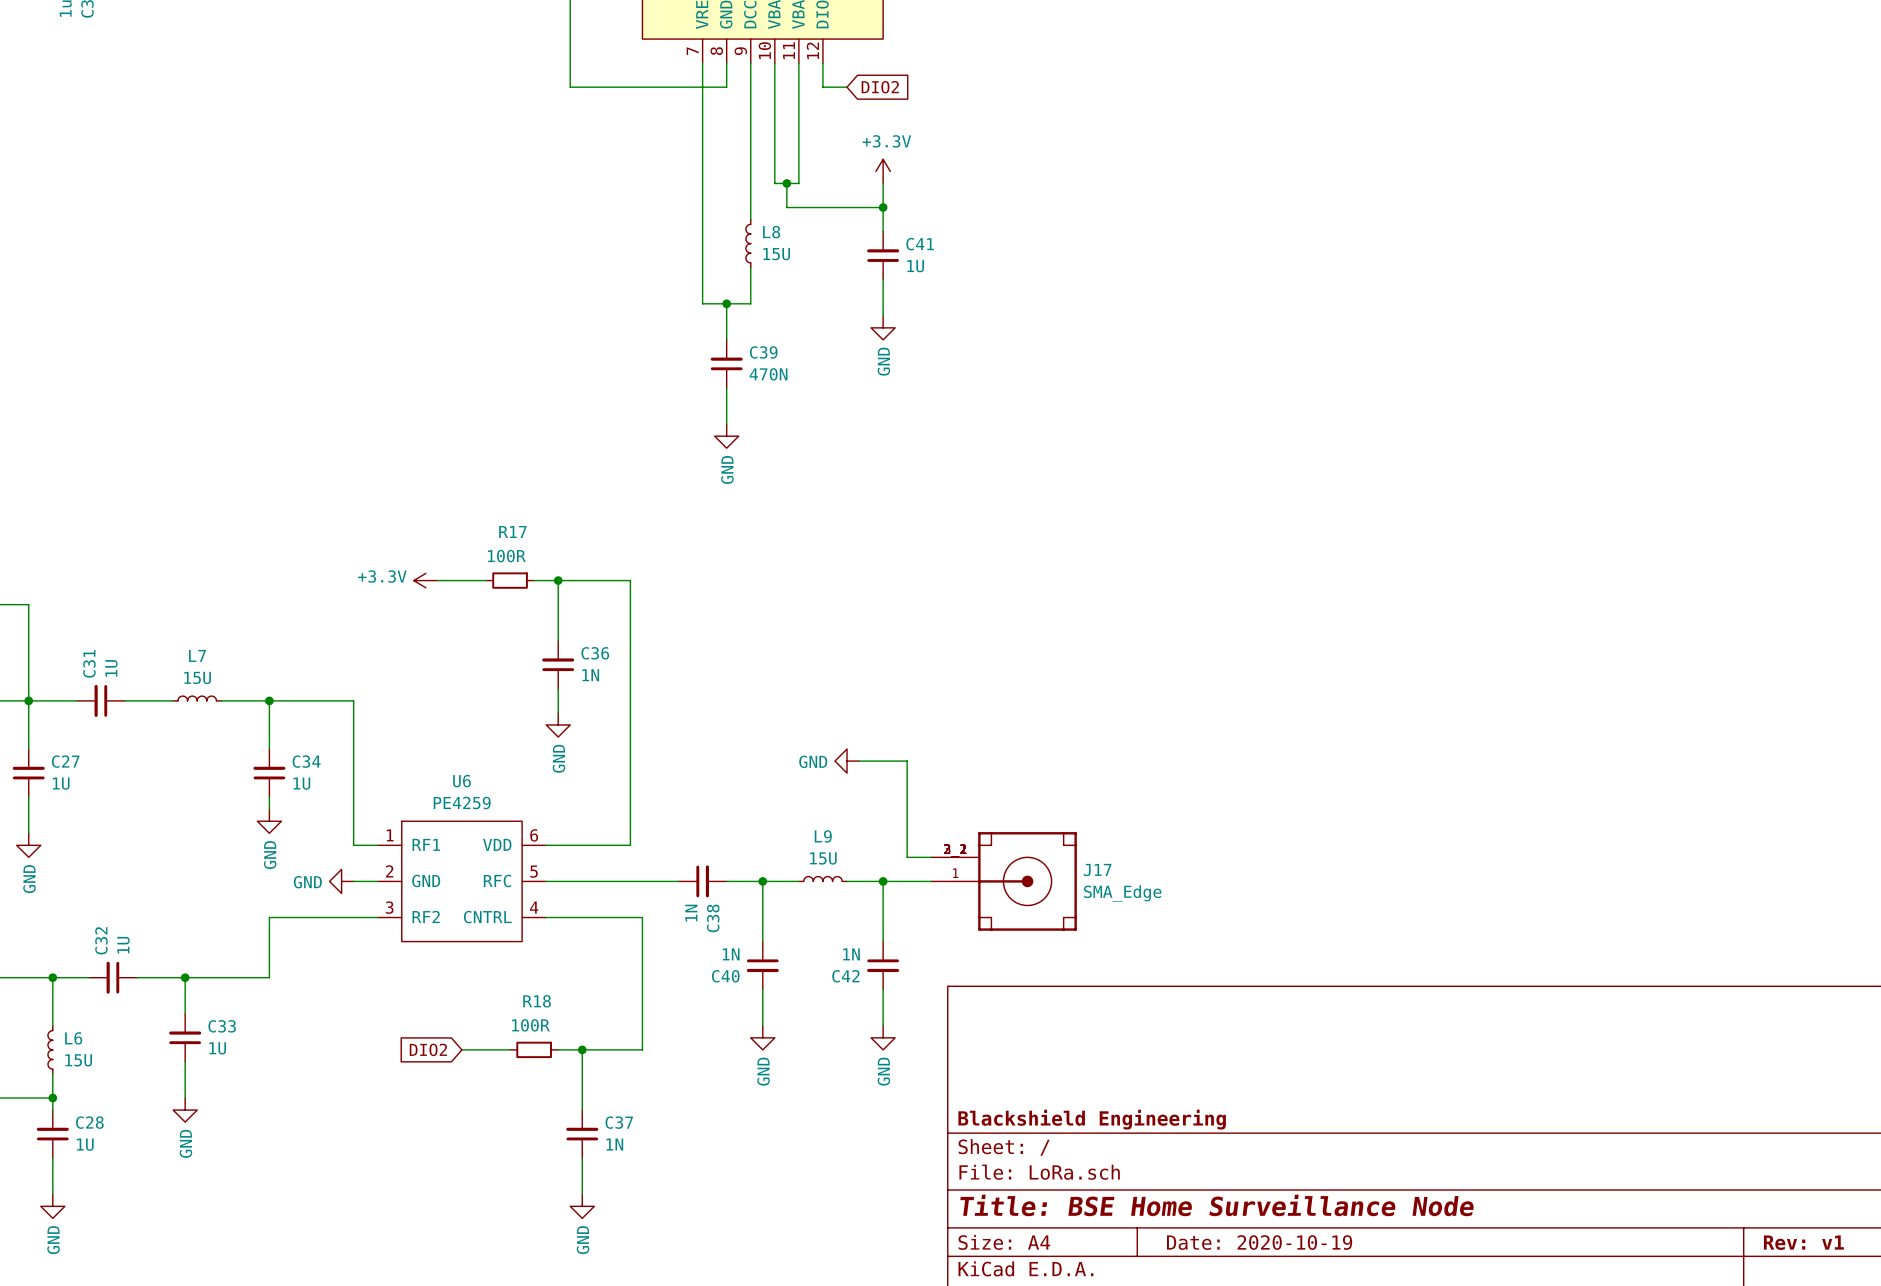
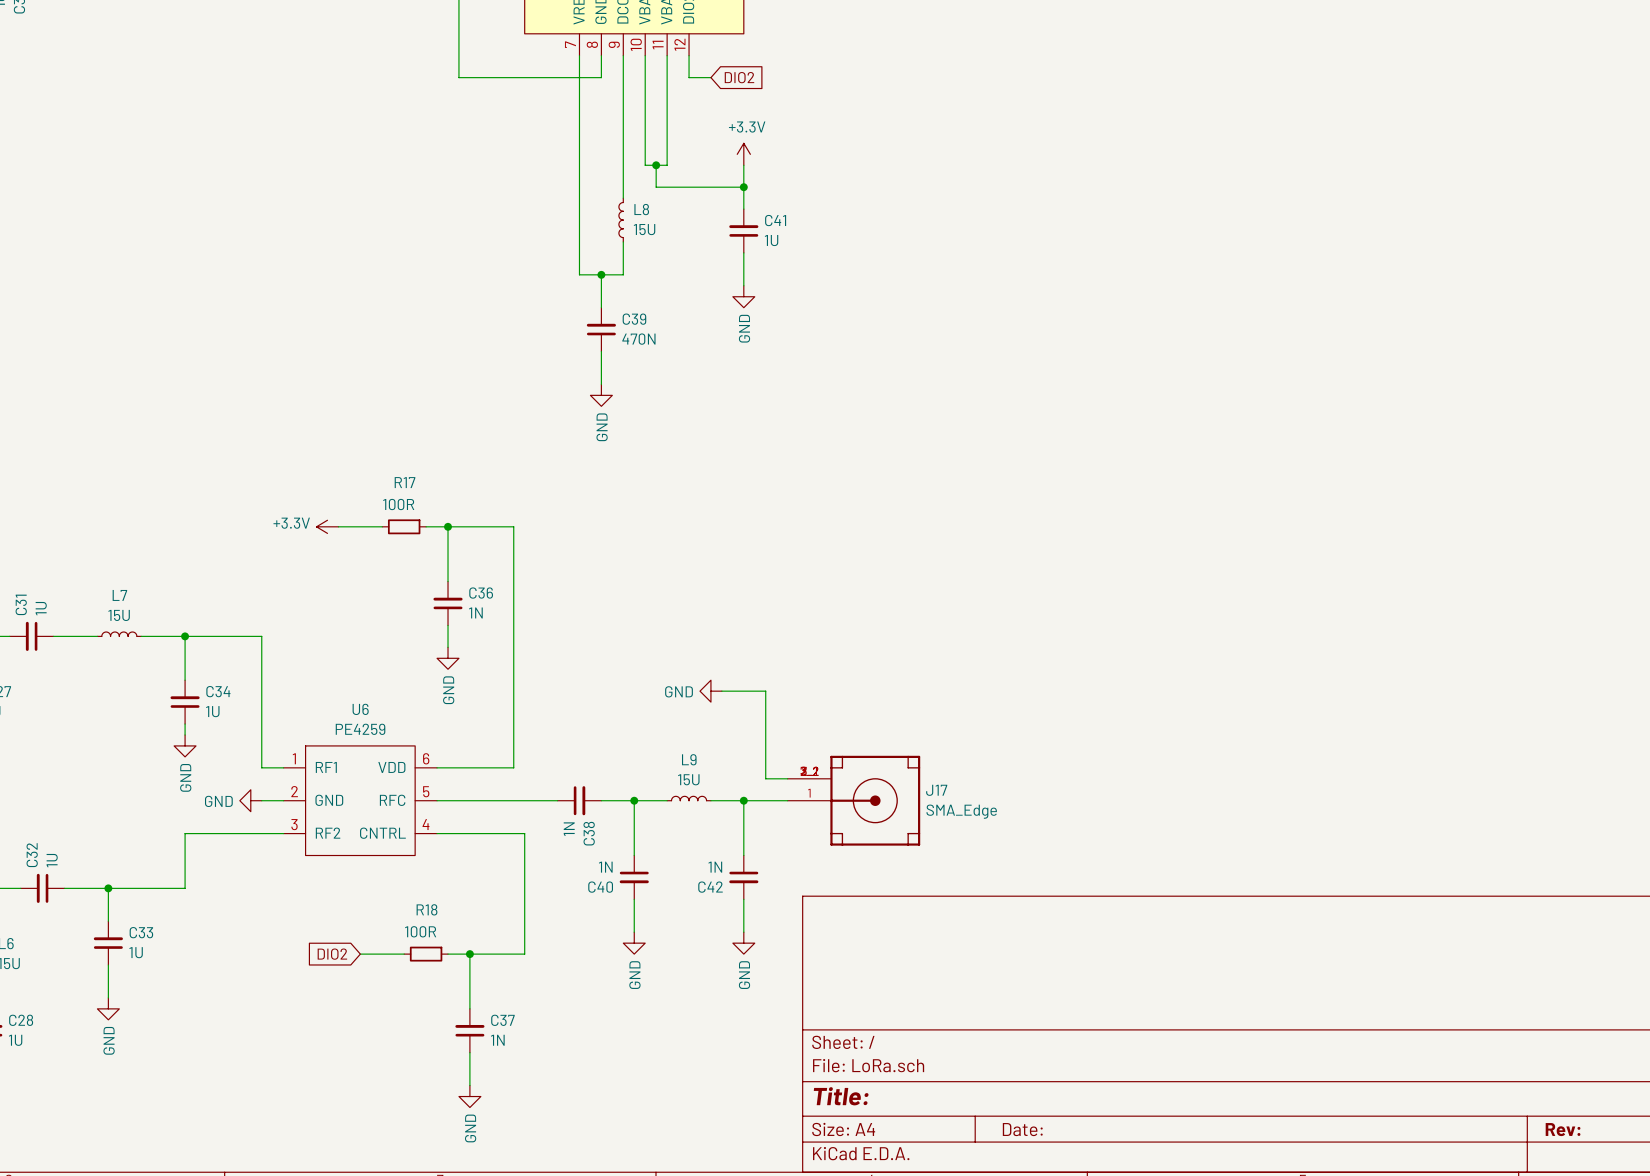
title block: Blackshield Engineering (1092, 1119) -> none
title block: Title: BSE Home Surveillance Node (1217, 1205) -> Title: (841, 1096)
title block: Date: 2020-10-19 (1259, 1242) -> Date: (1022, 1129)
title block: Rev: v1 (1803, 1242) -> Rev: (1563, 1129)

